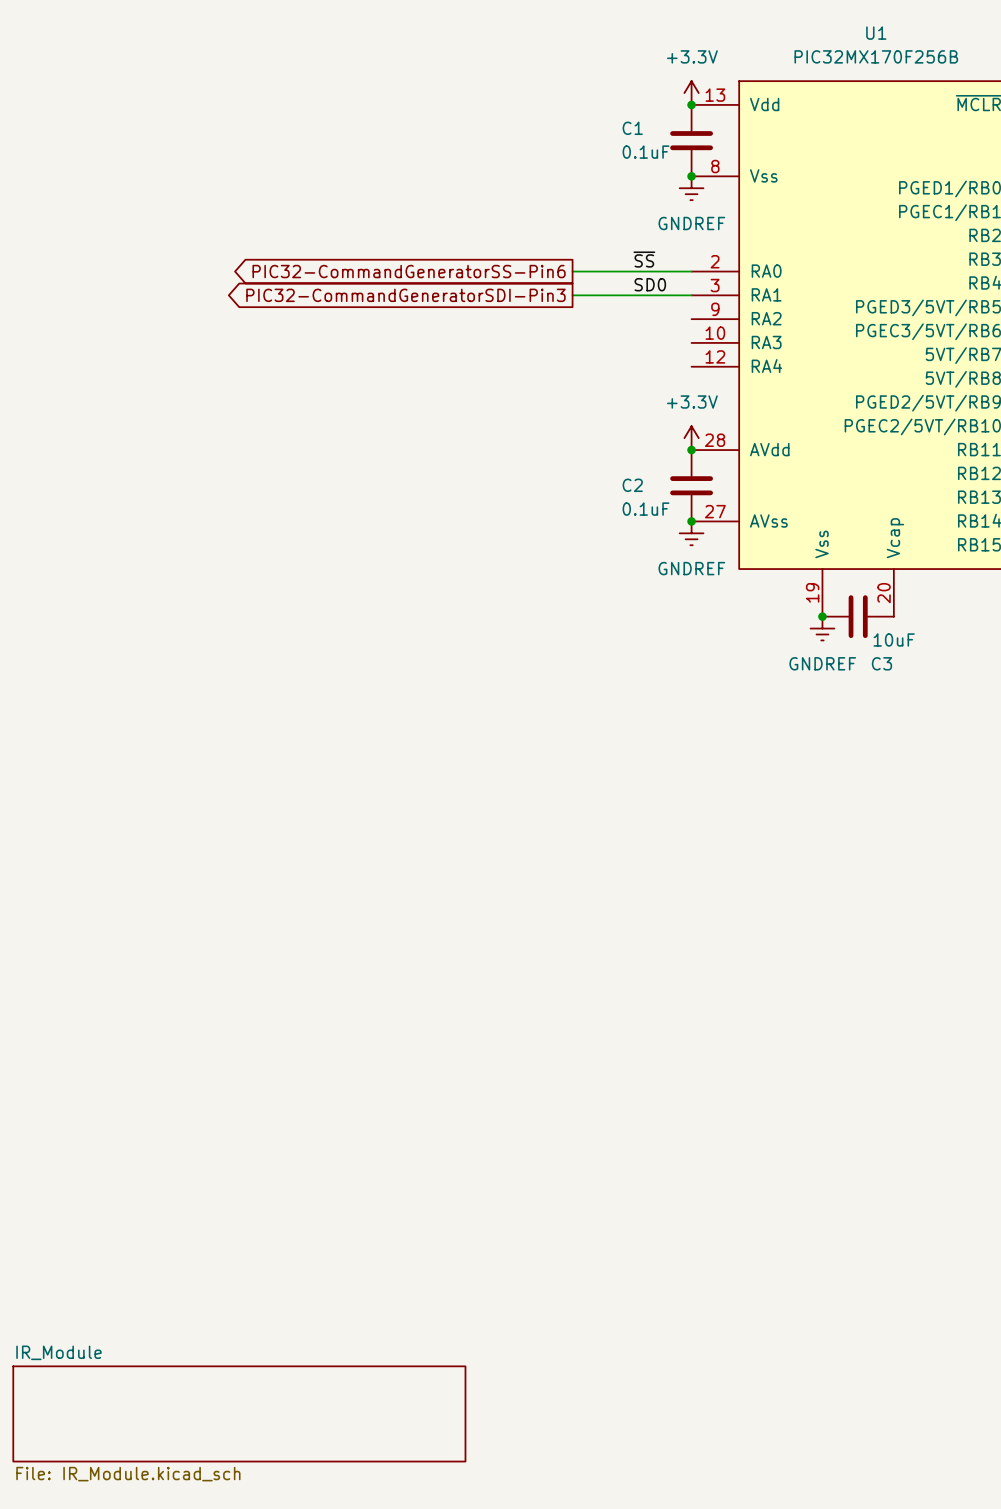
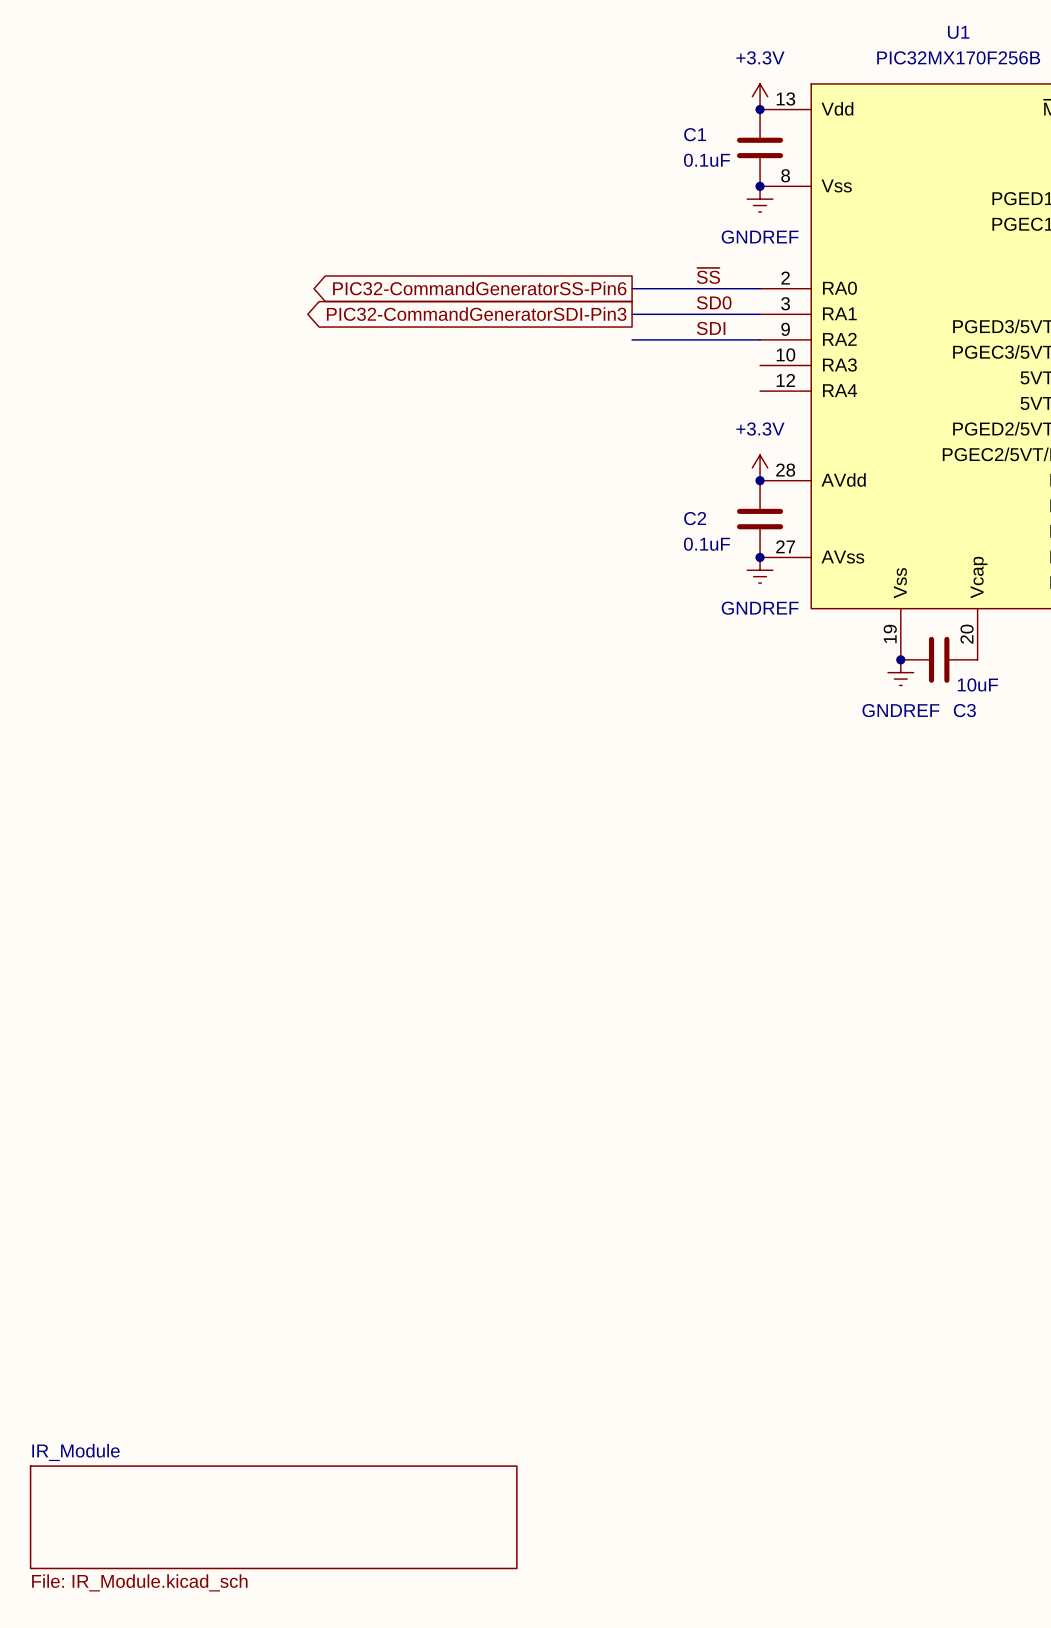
label: none -> SDI (711, 328)
wire: none -> (632, 339) (760, 339)

